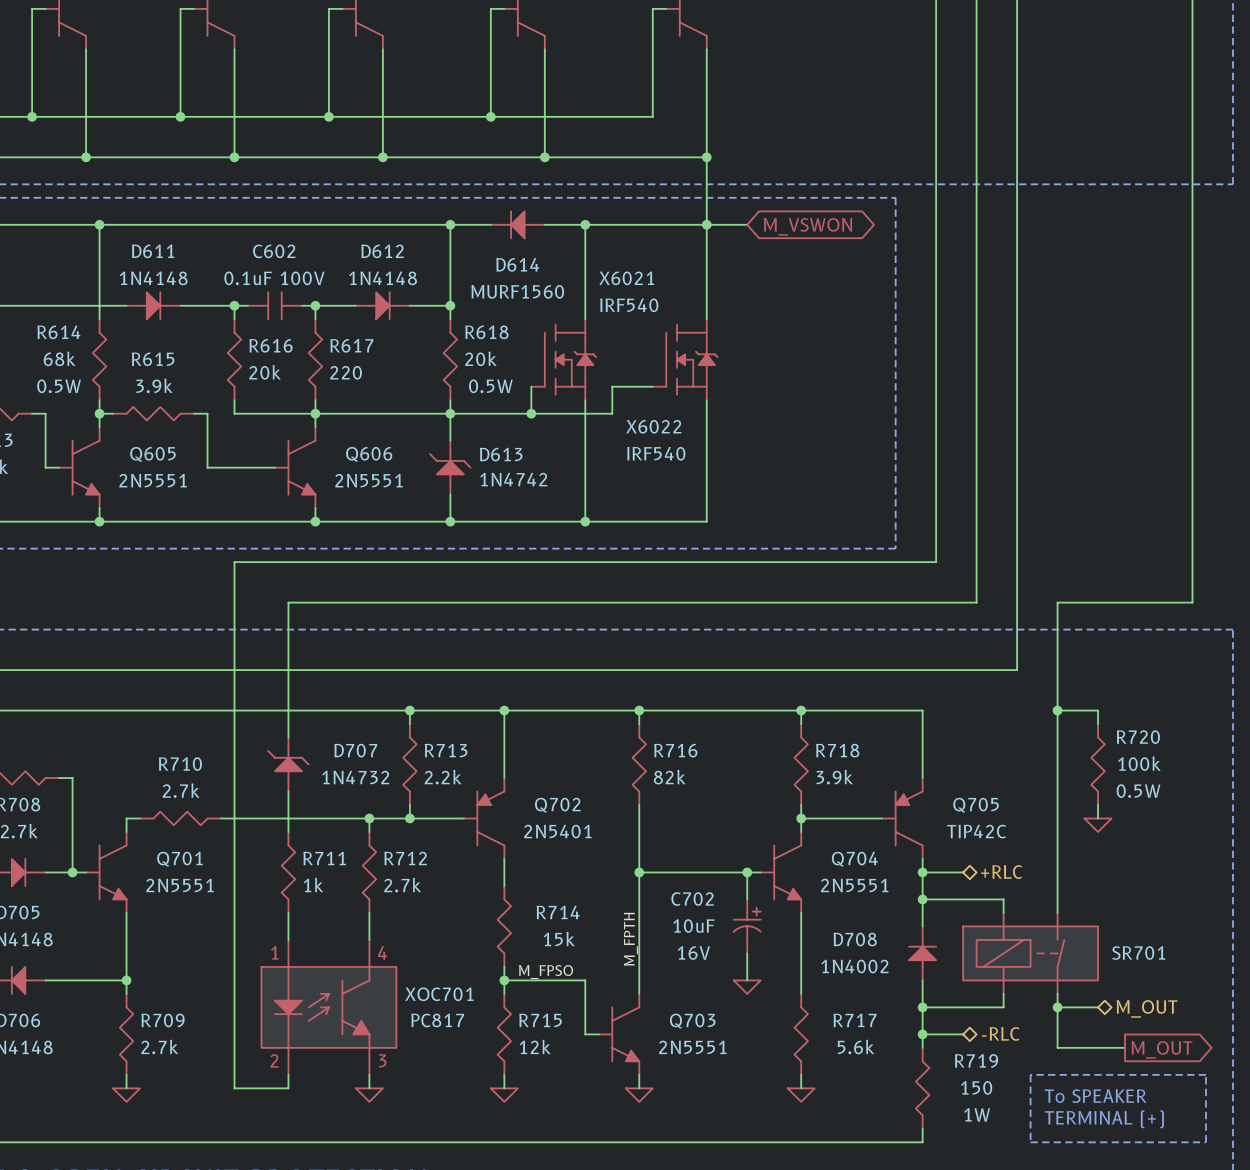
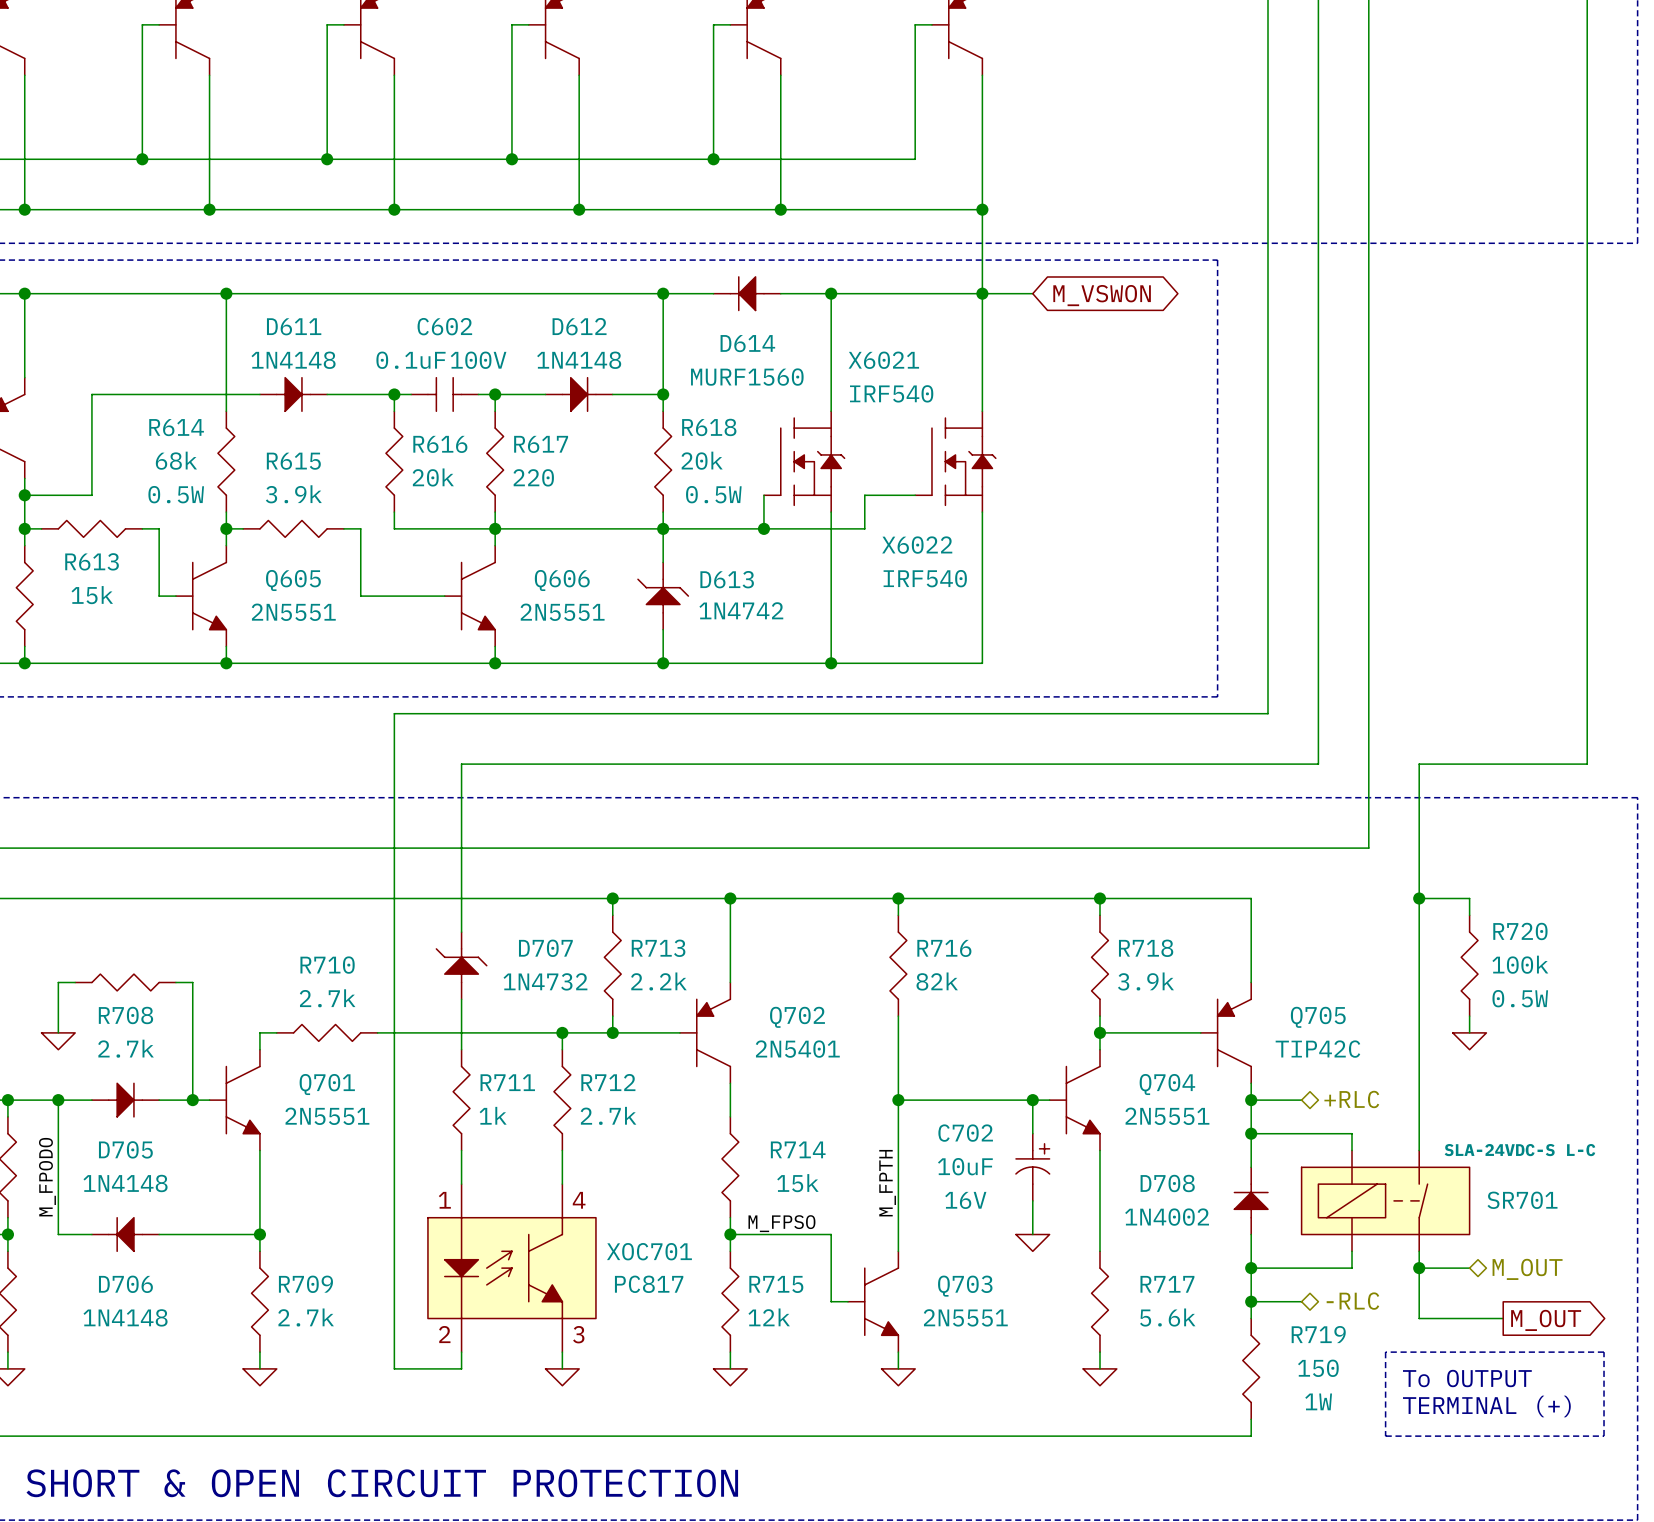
SR701 text: none -> SLA-24VDC-S L-C (1519, 1150)
text: To SPEAKER (1095, 1096) -> To OUTPUT (1467, 1378)

